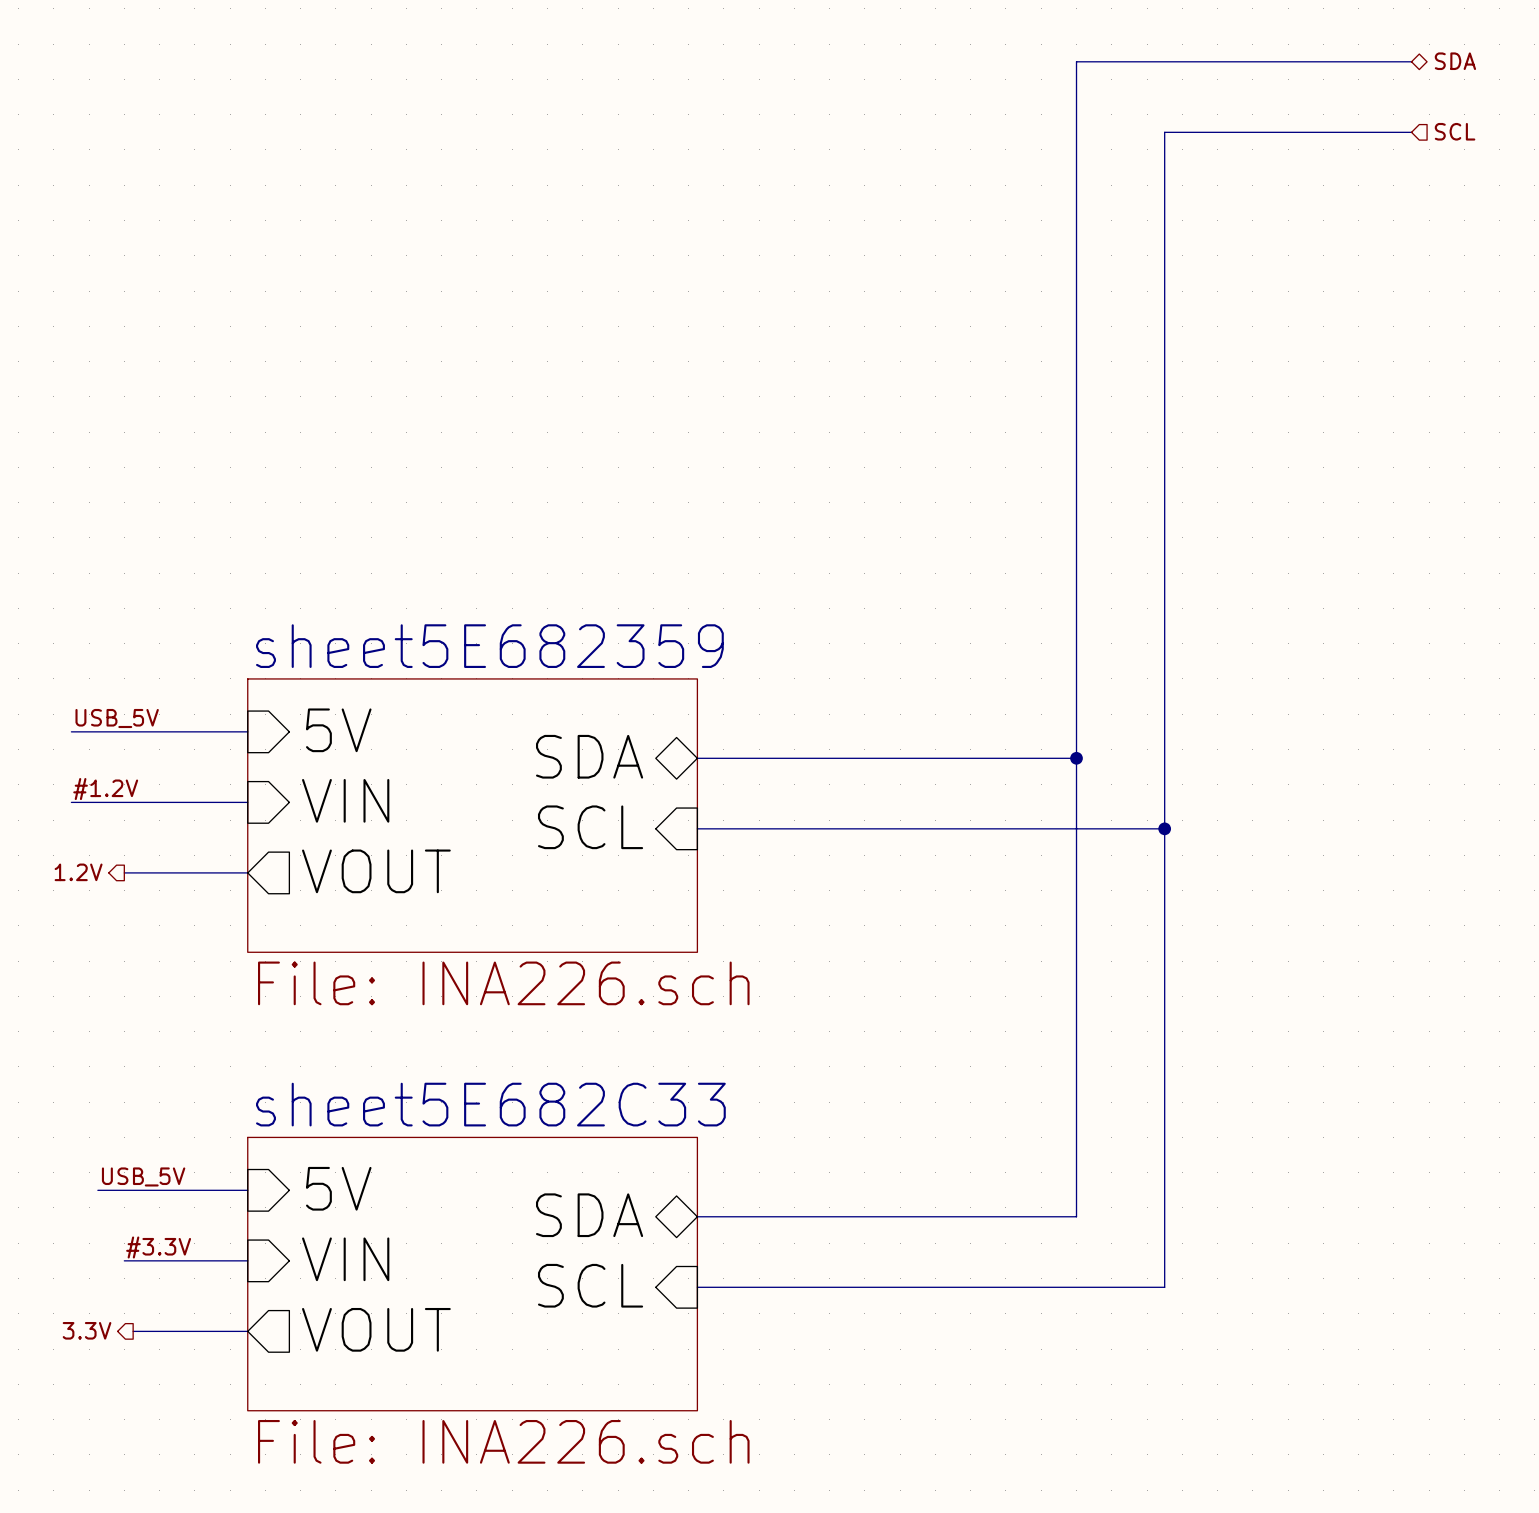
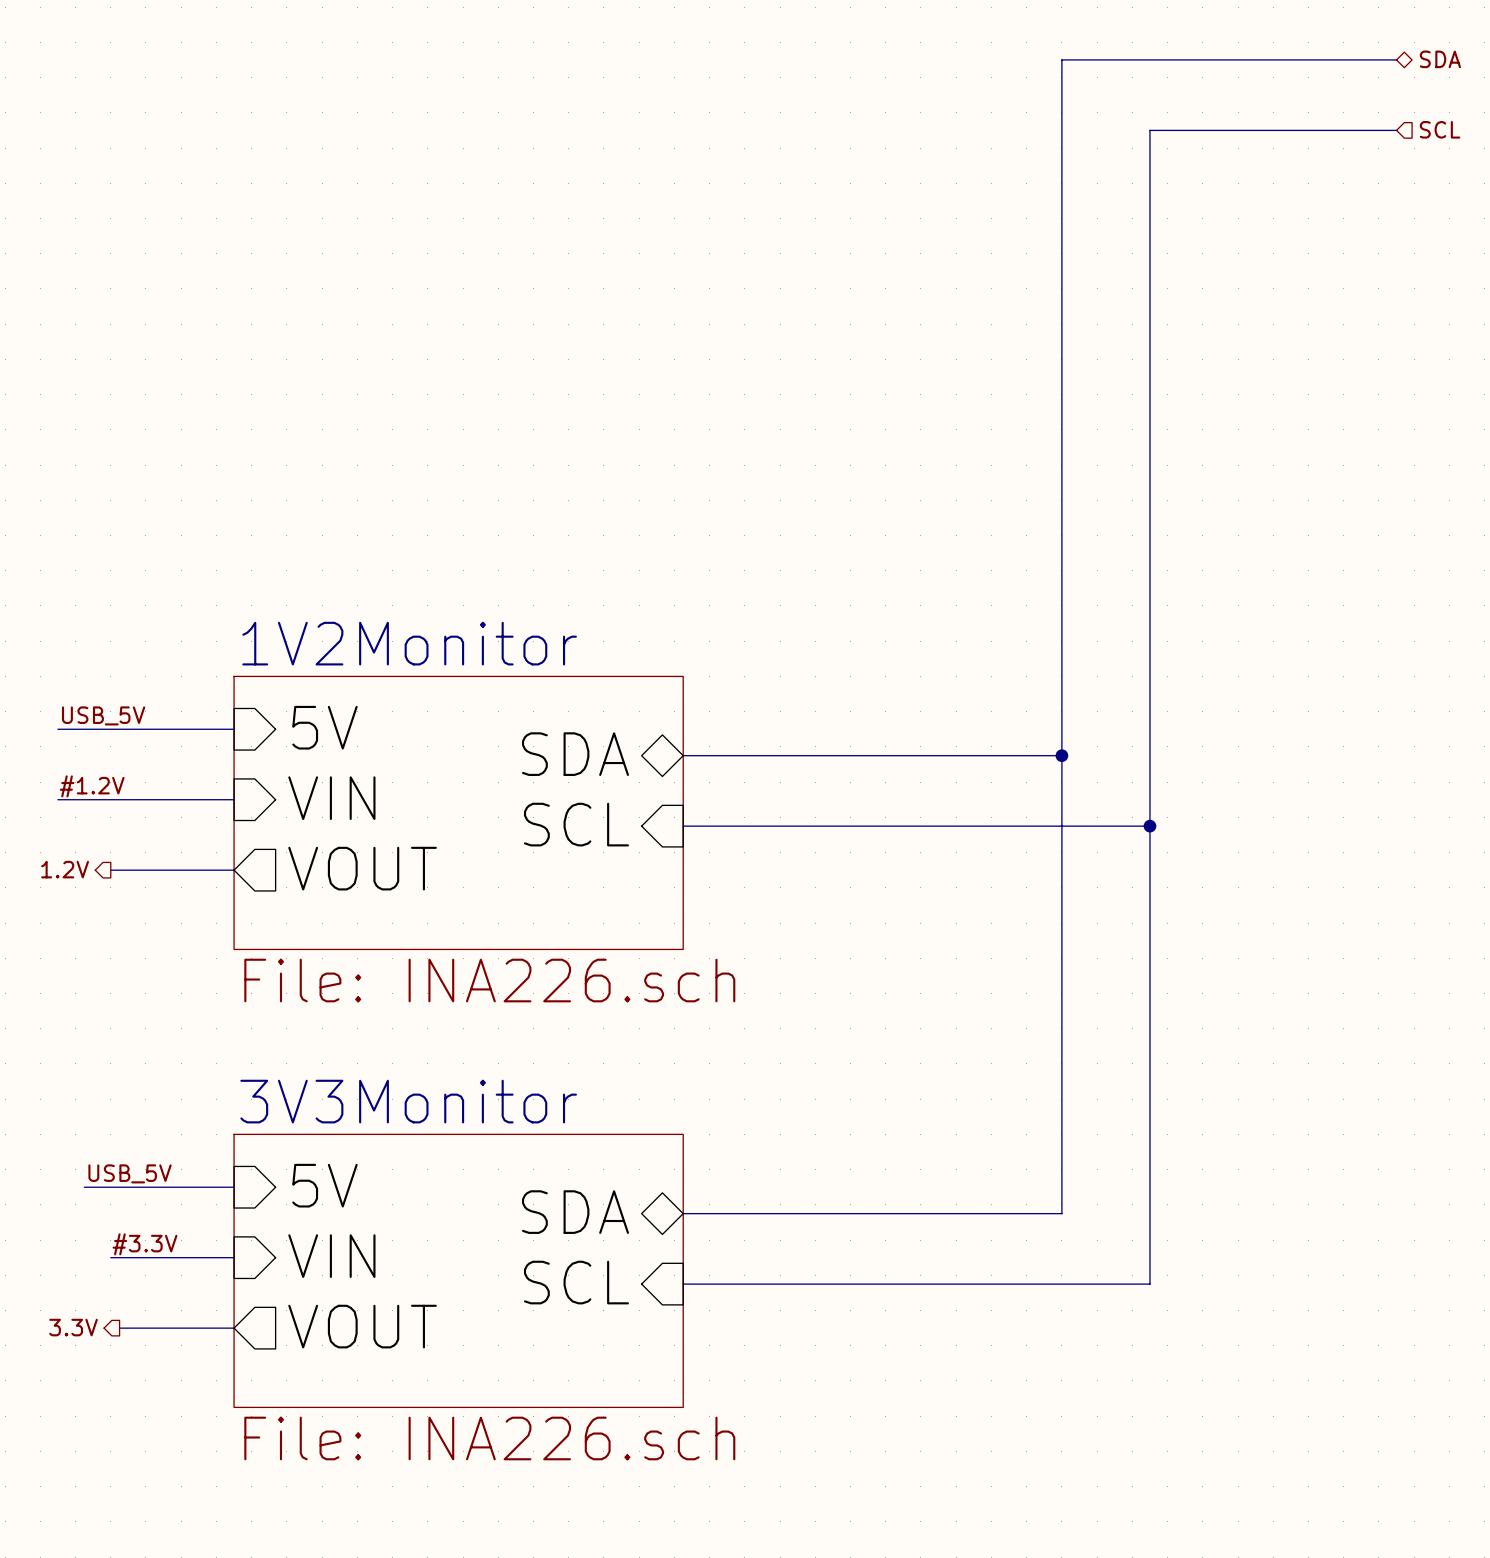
sheet sheet5E682359 name: sheet5E682359 (489, 646) -> 1V2Monitor (409, 643)
sheet sheet5E682C33 name: sheet5E682C33 (490, 1104) -> 3V3Monitor (408, 1101)

